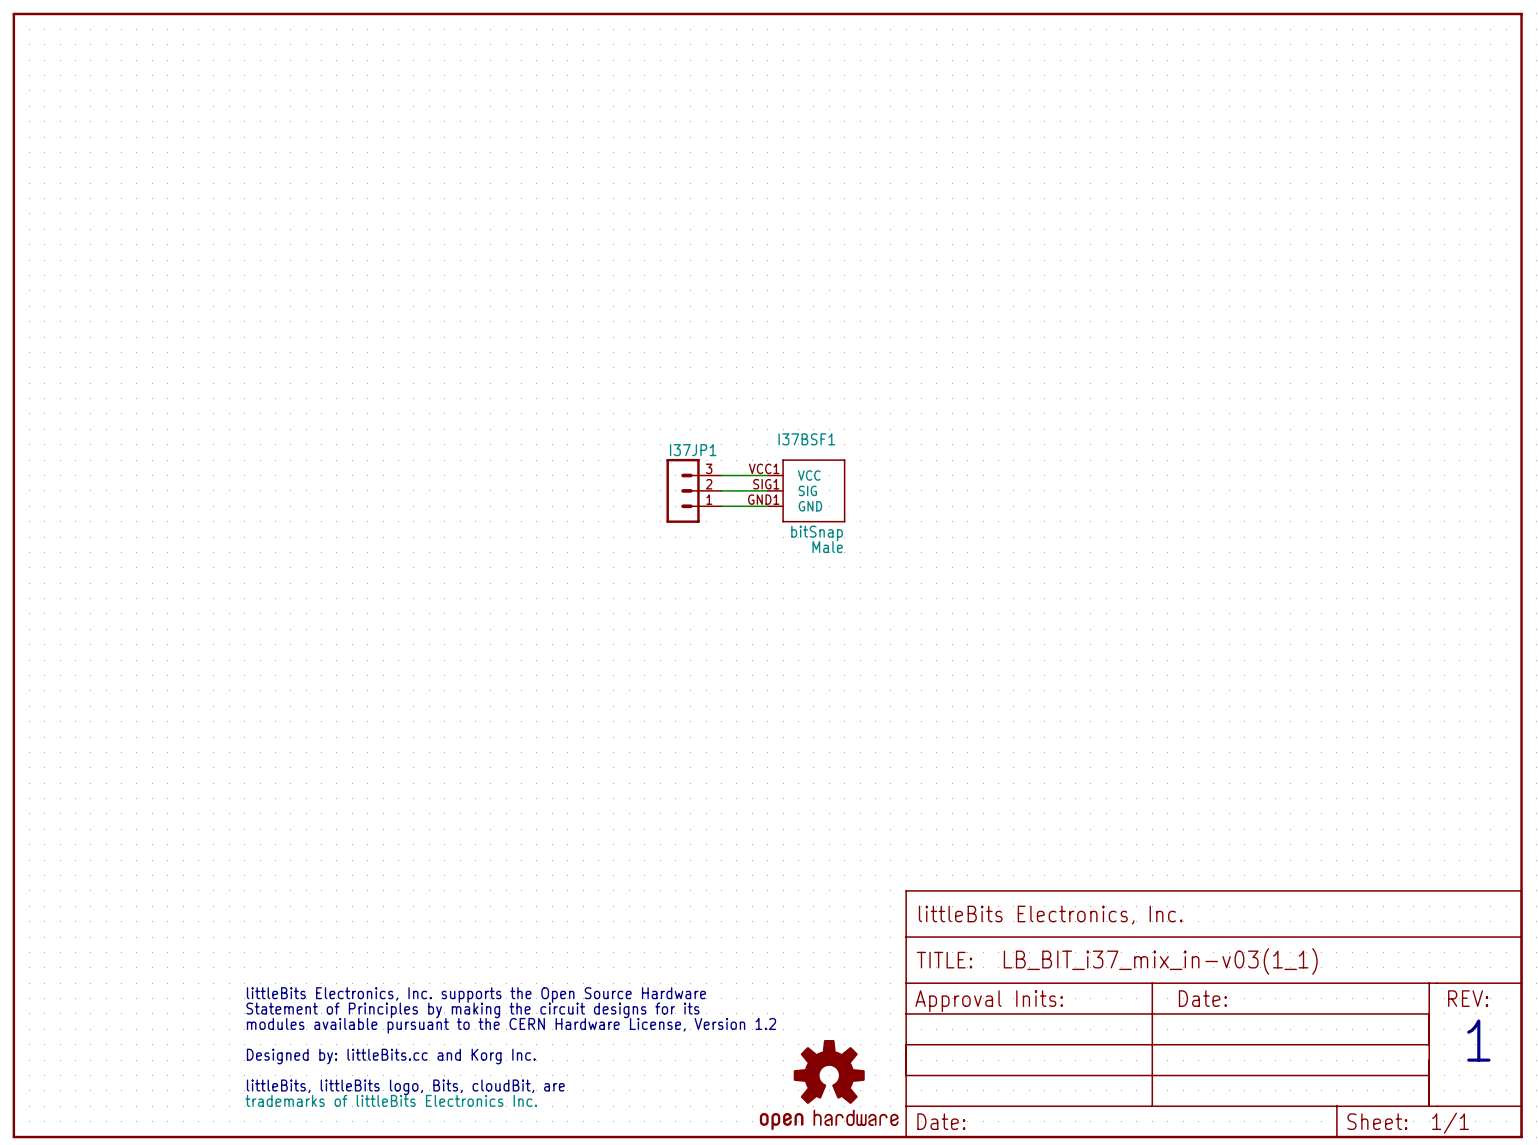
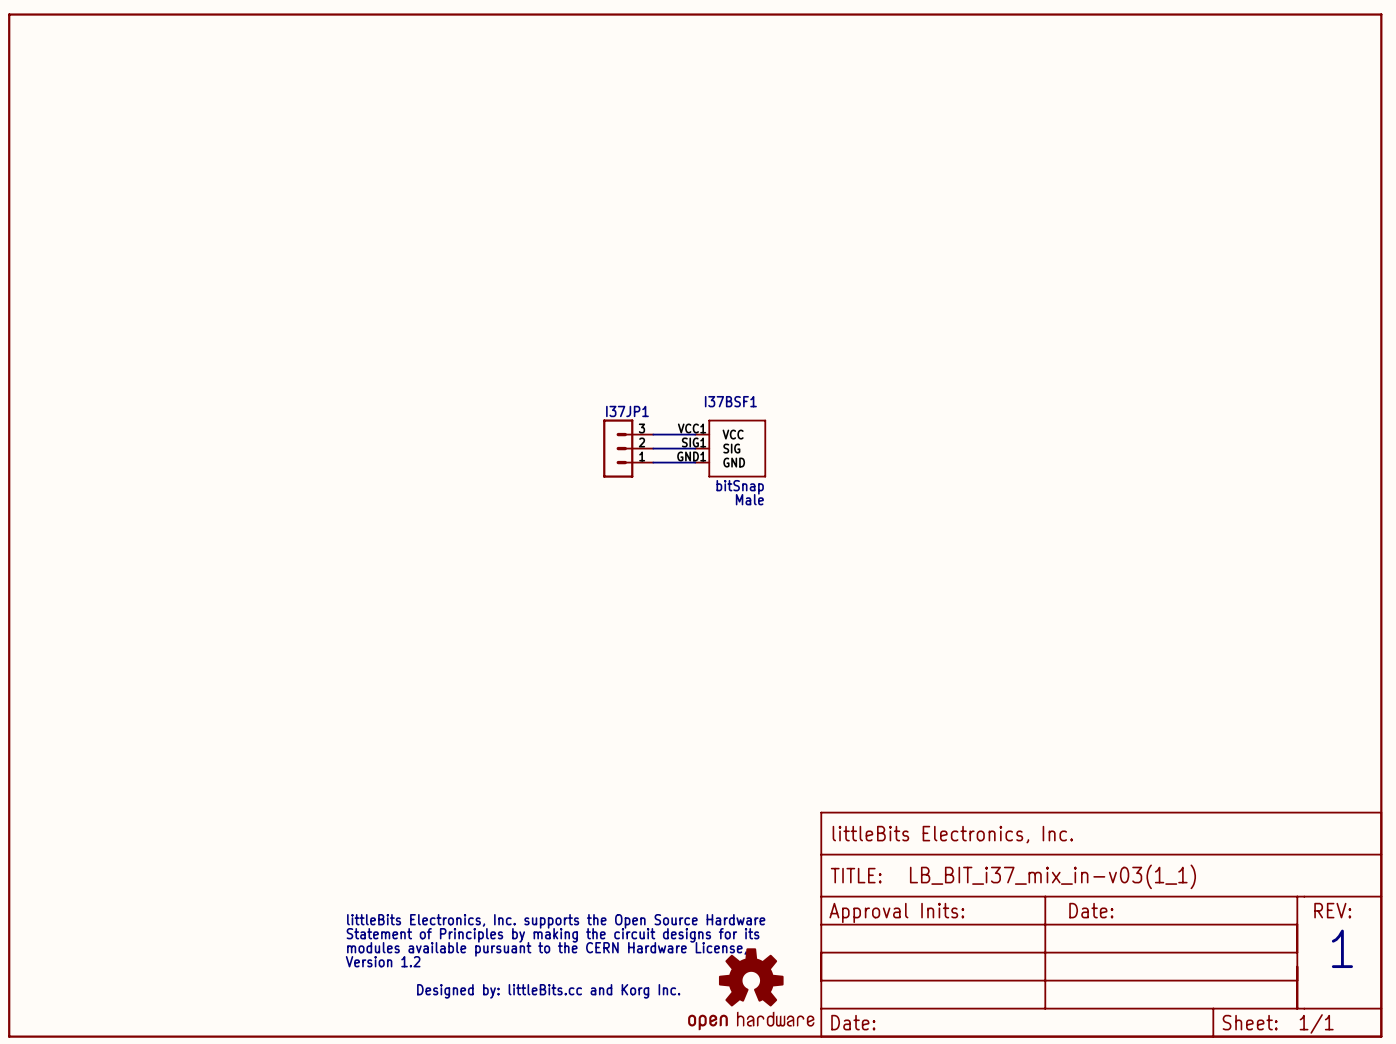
part: (510, 1047) -> none
part: none -> (555, 956)

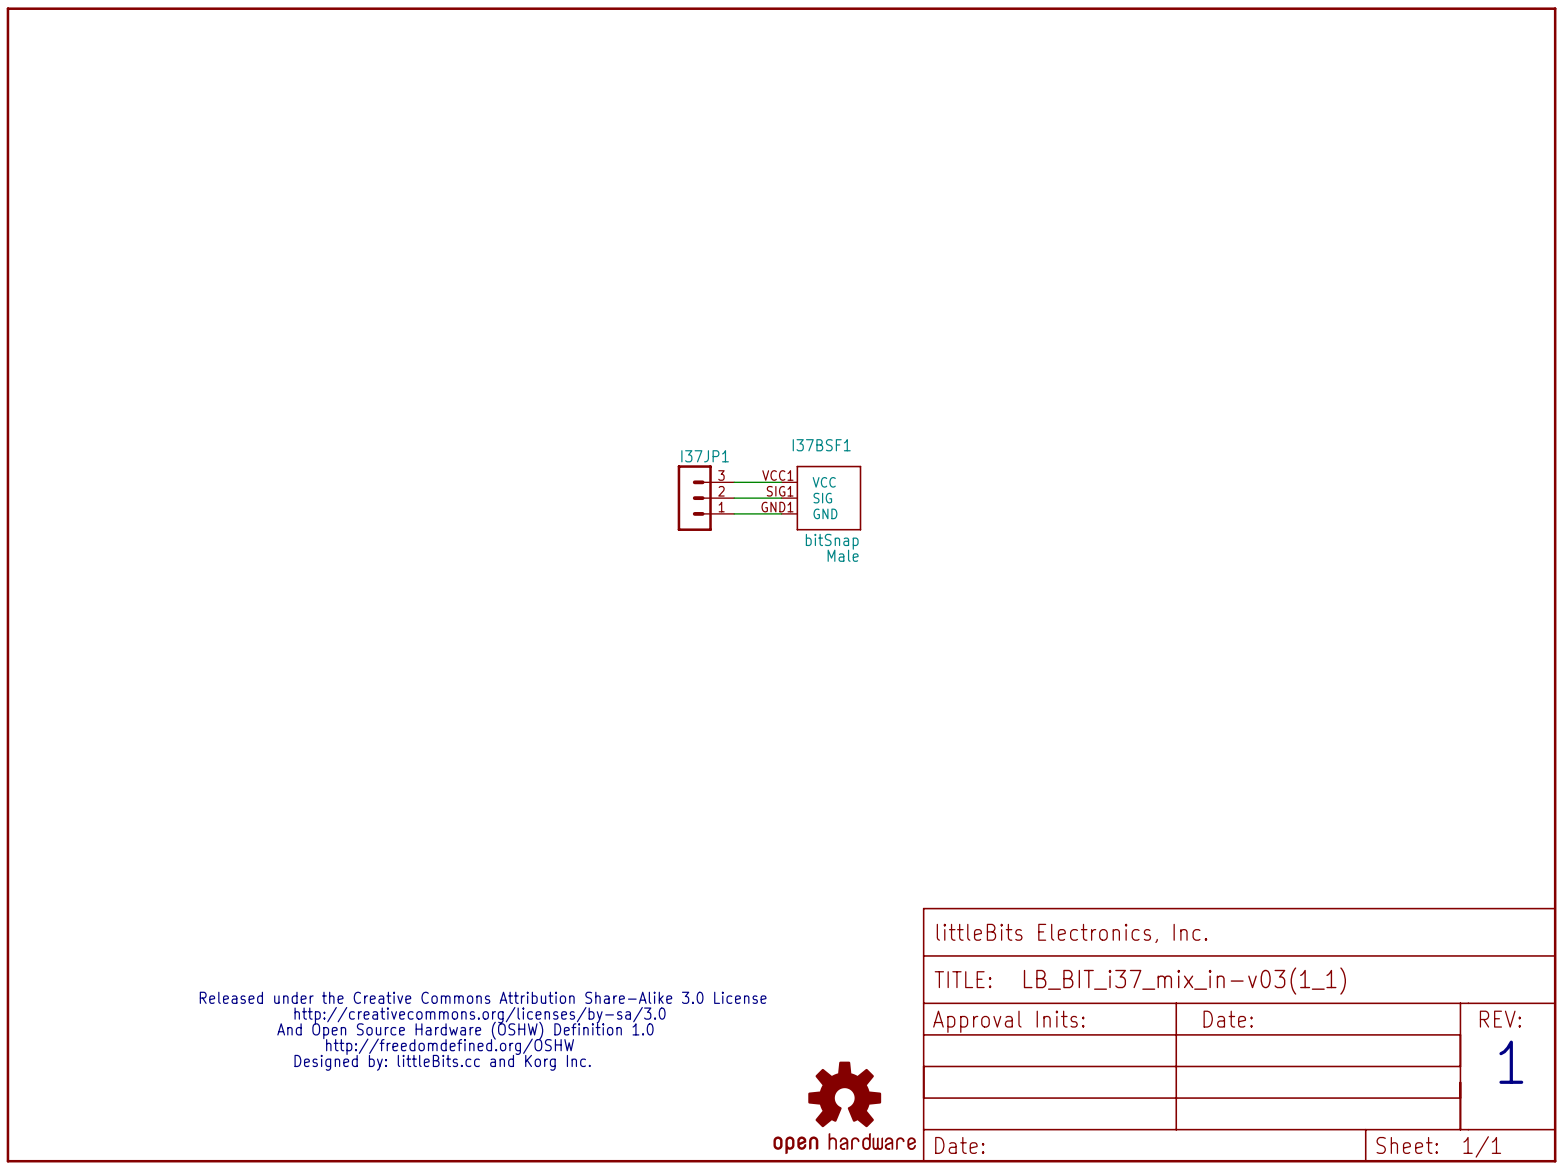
part: none -> (483, 1031)
part: (555, 956) -> none

